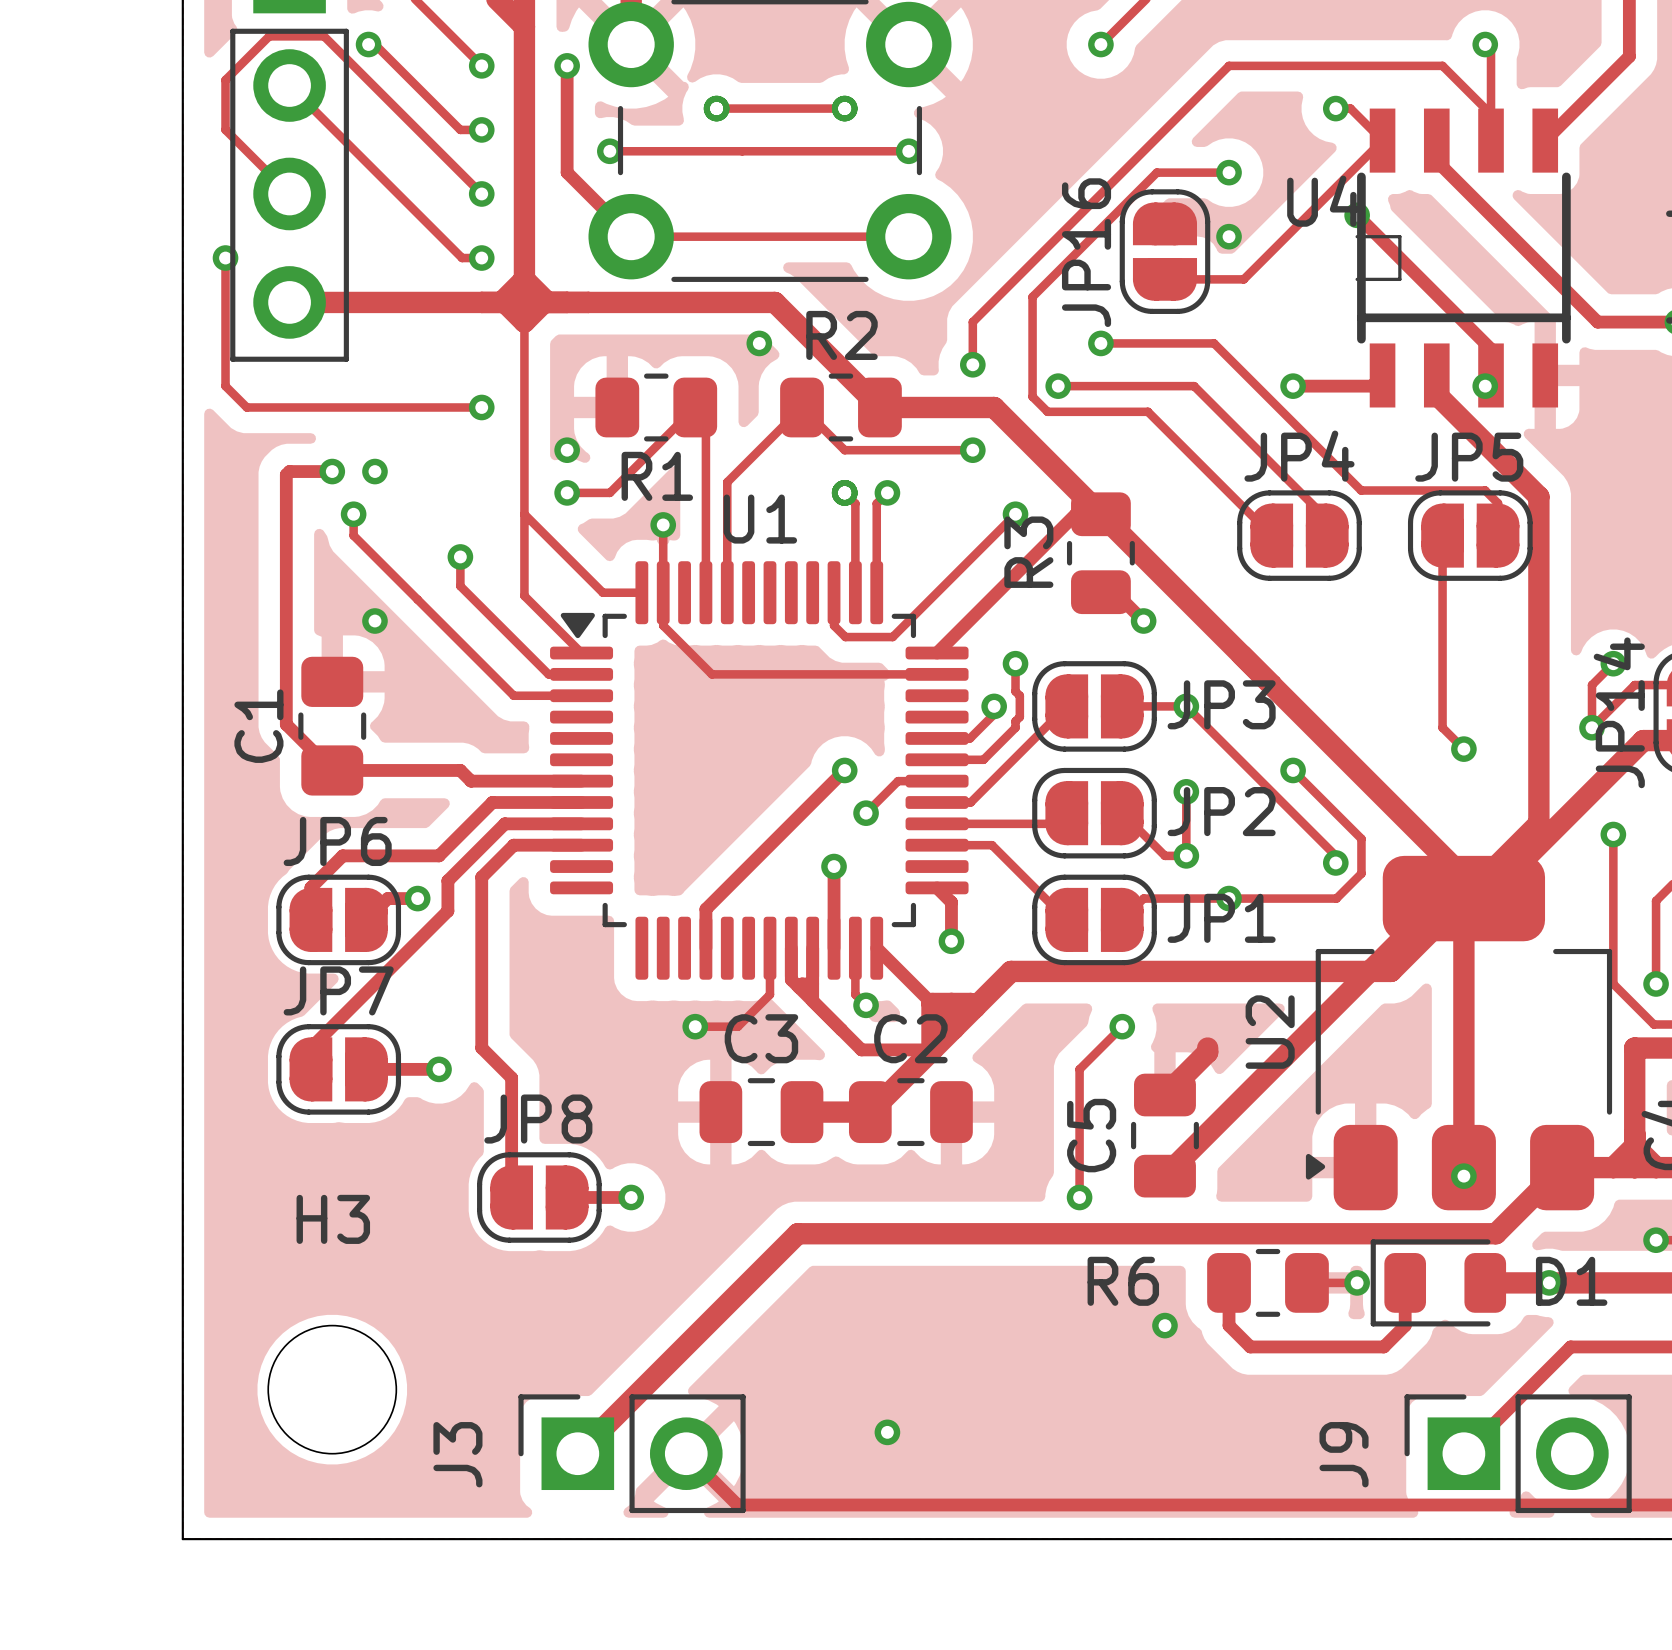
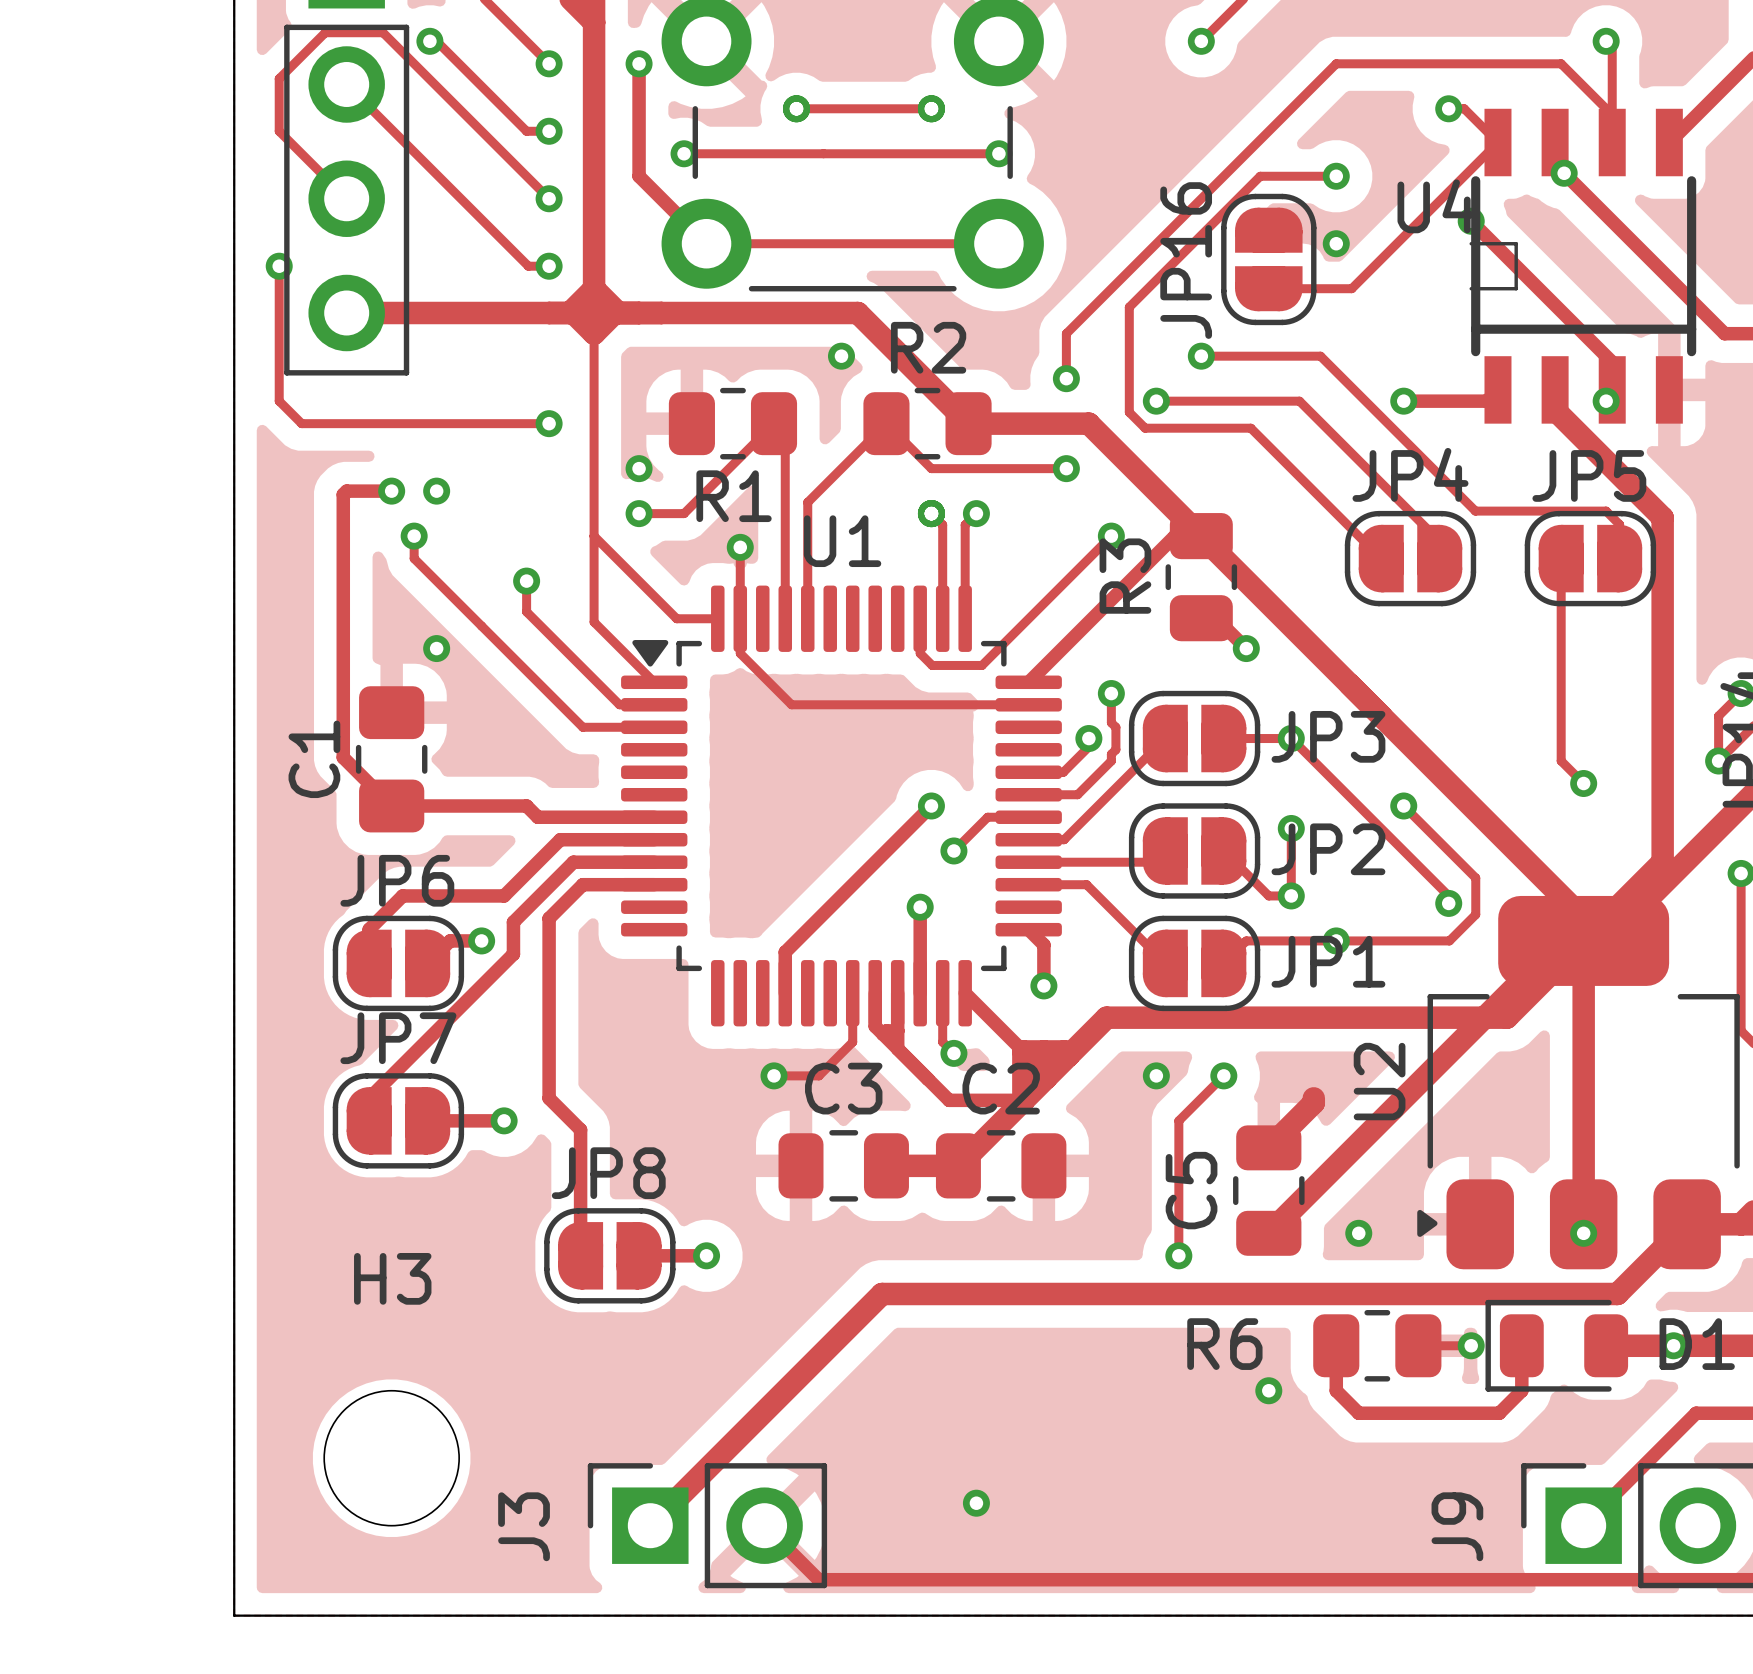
via: none -> (1564, 173)
via: none -> (1156, 1075)
via: none -> (1358, 1233)

